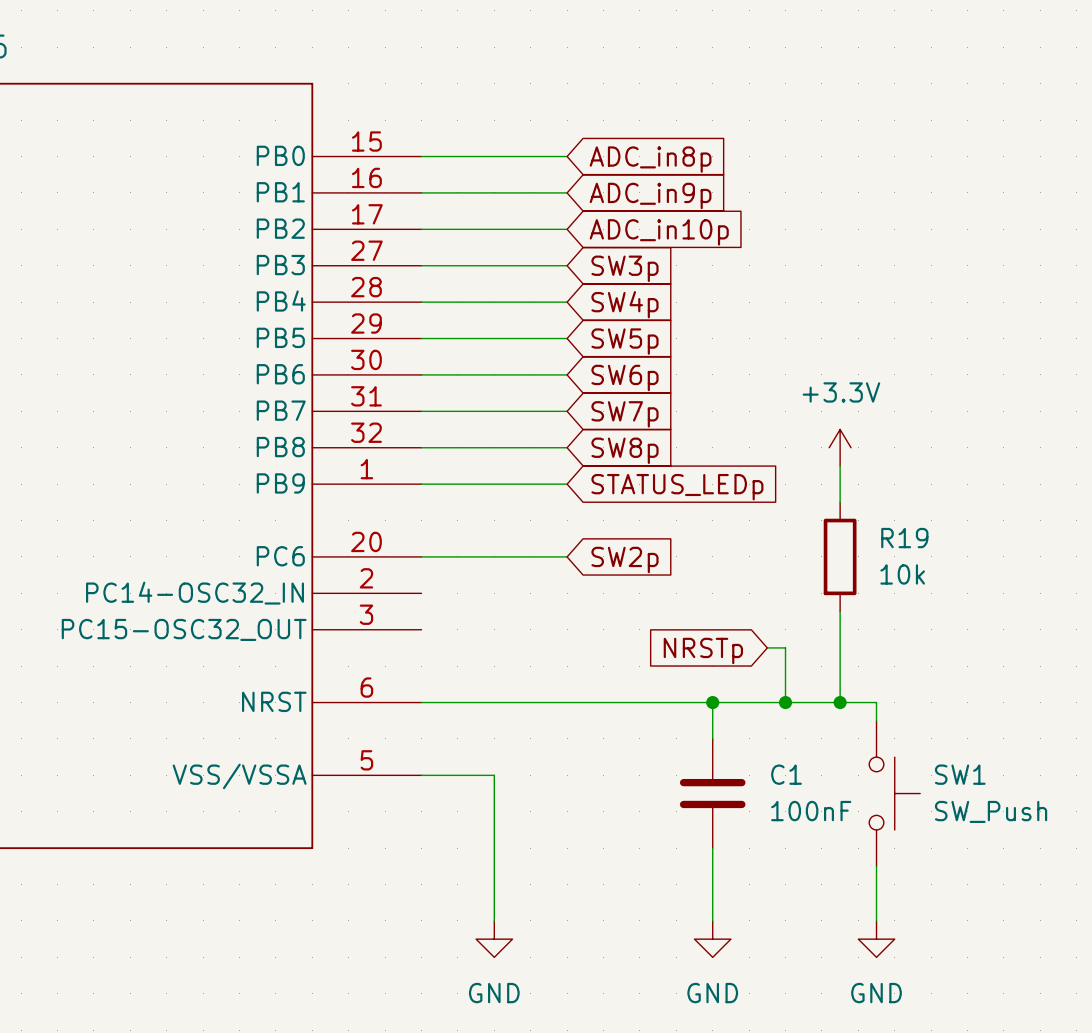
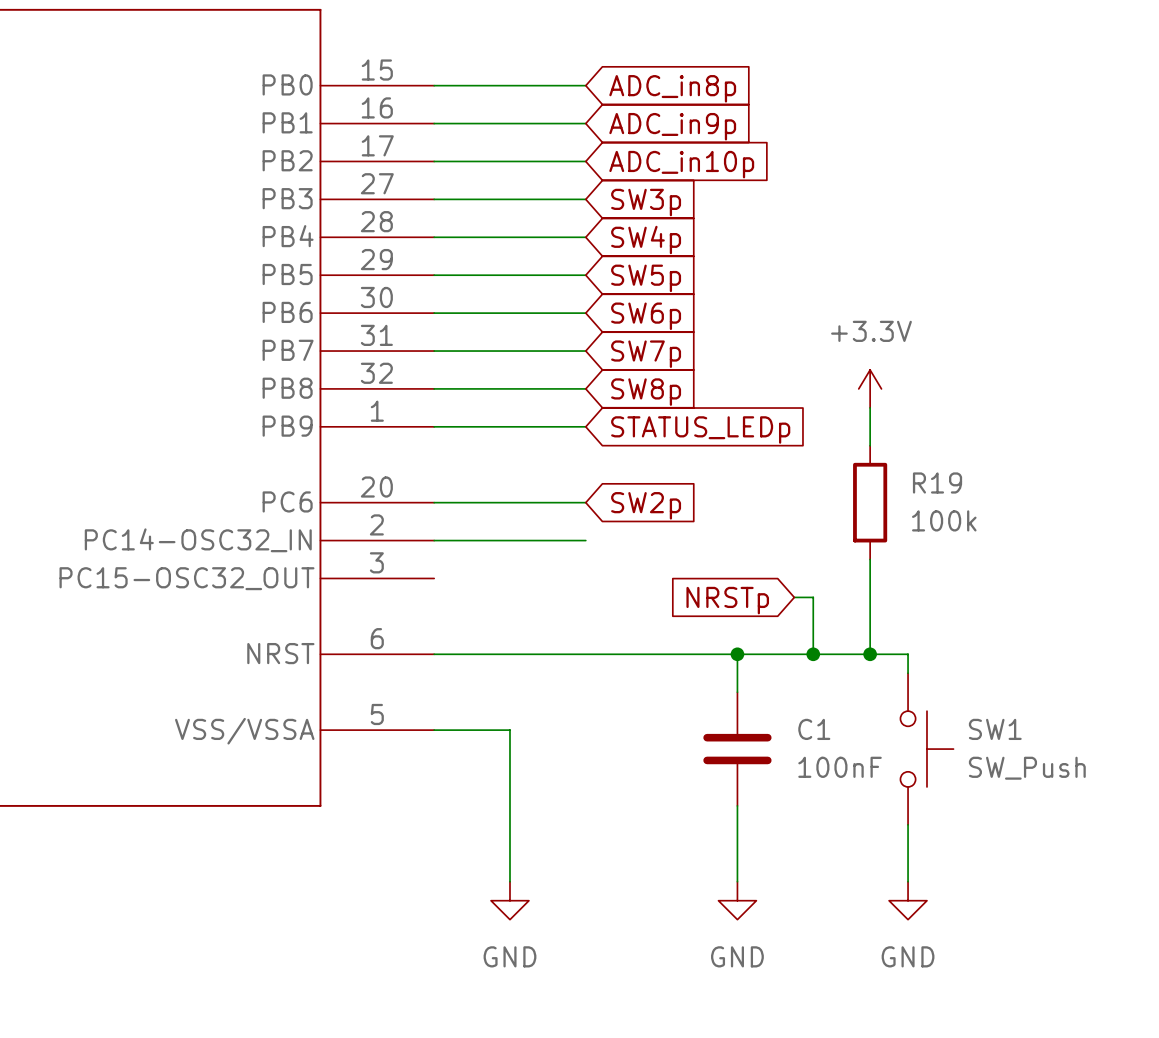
R19 value: 10k (902, 574) -> 100k (944, 520)
wire: none -> (434, 540) (585, 540)

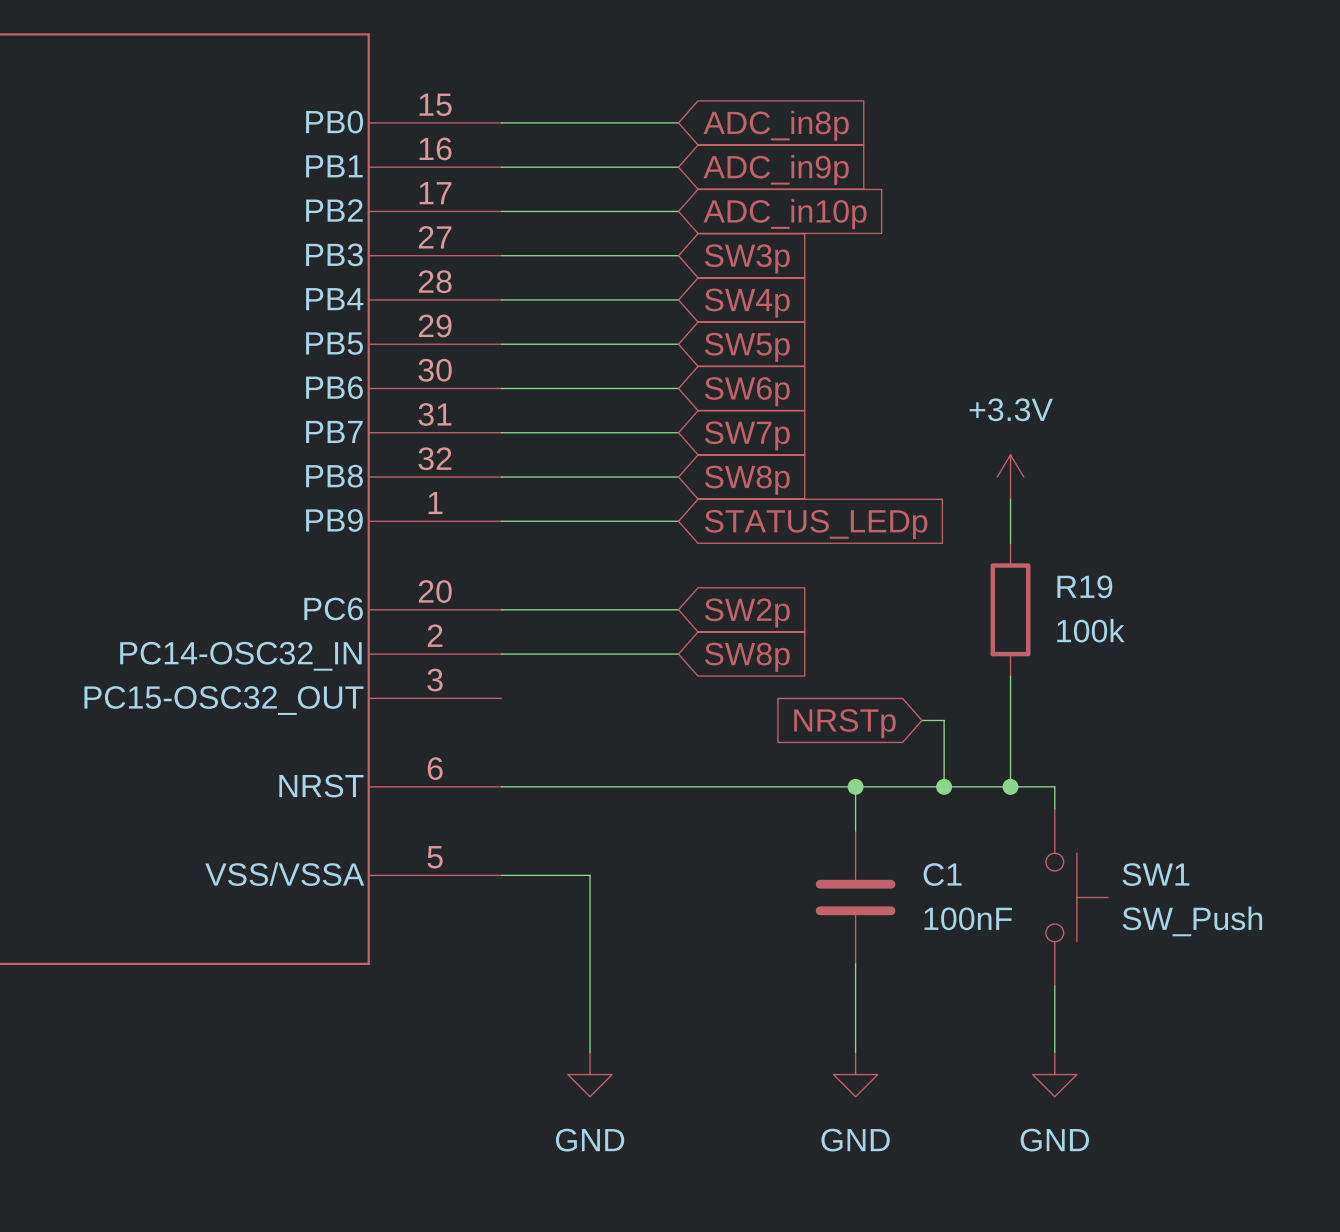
global label: none -> SW8p (747, 657)

